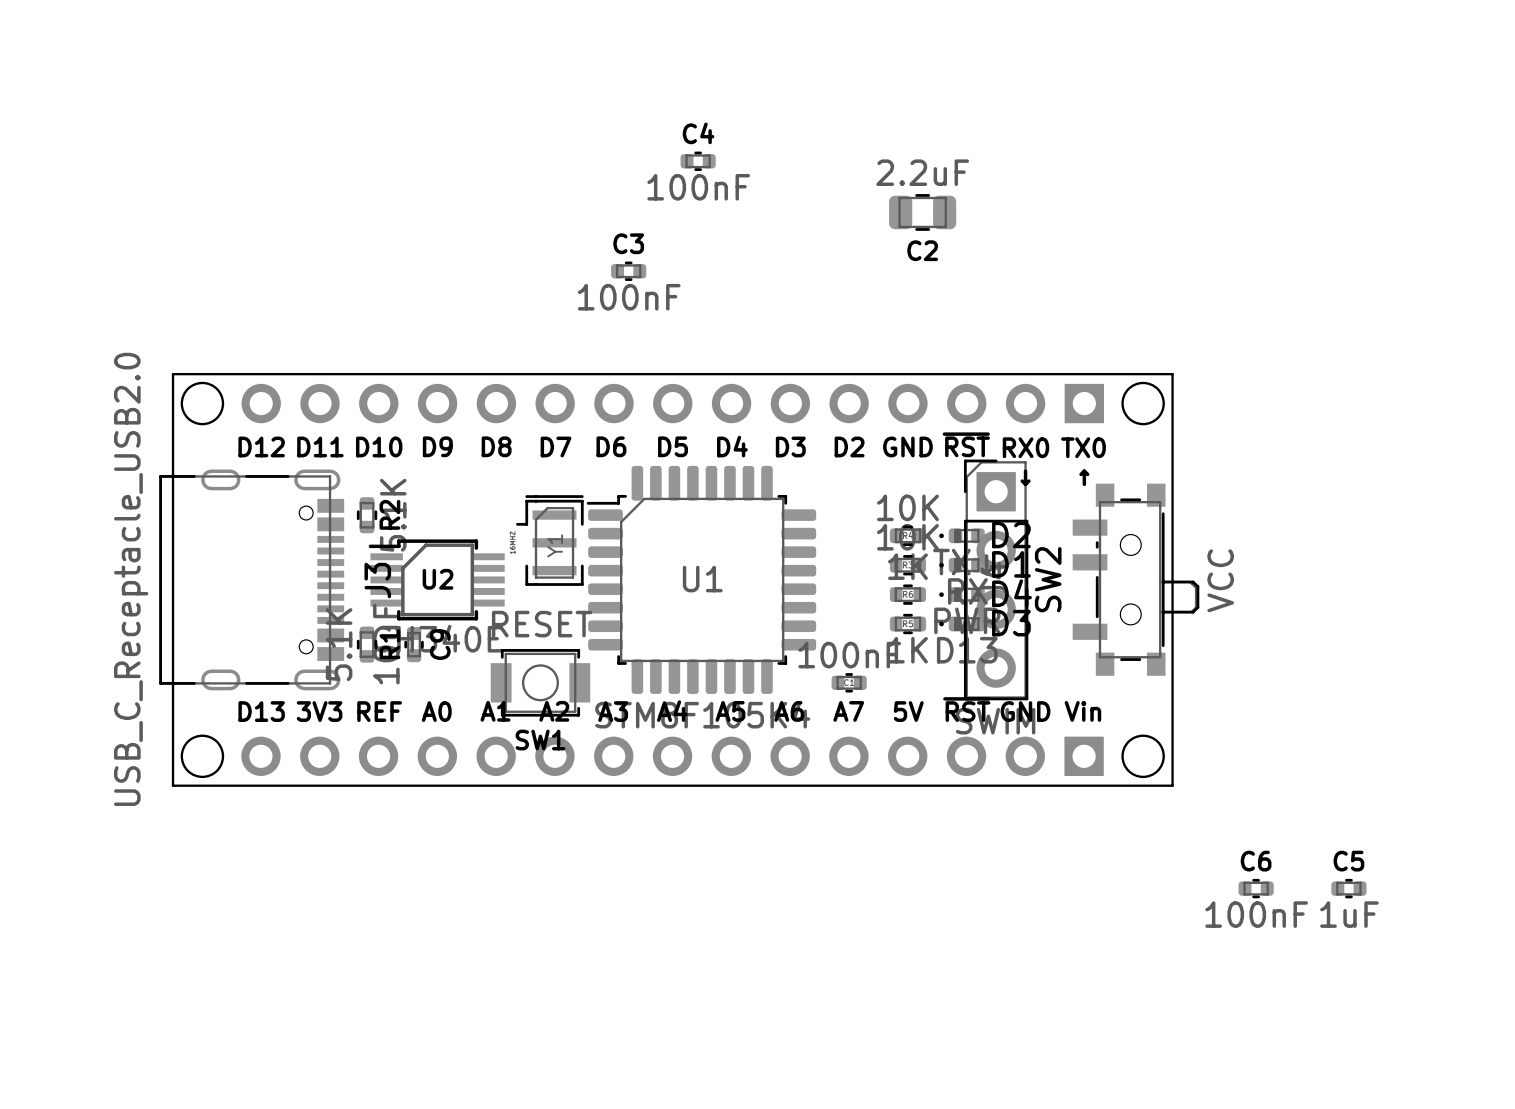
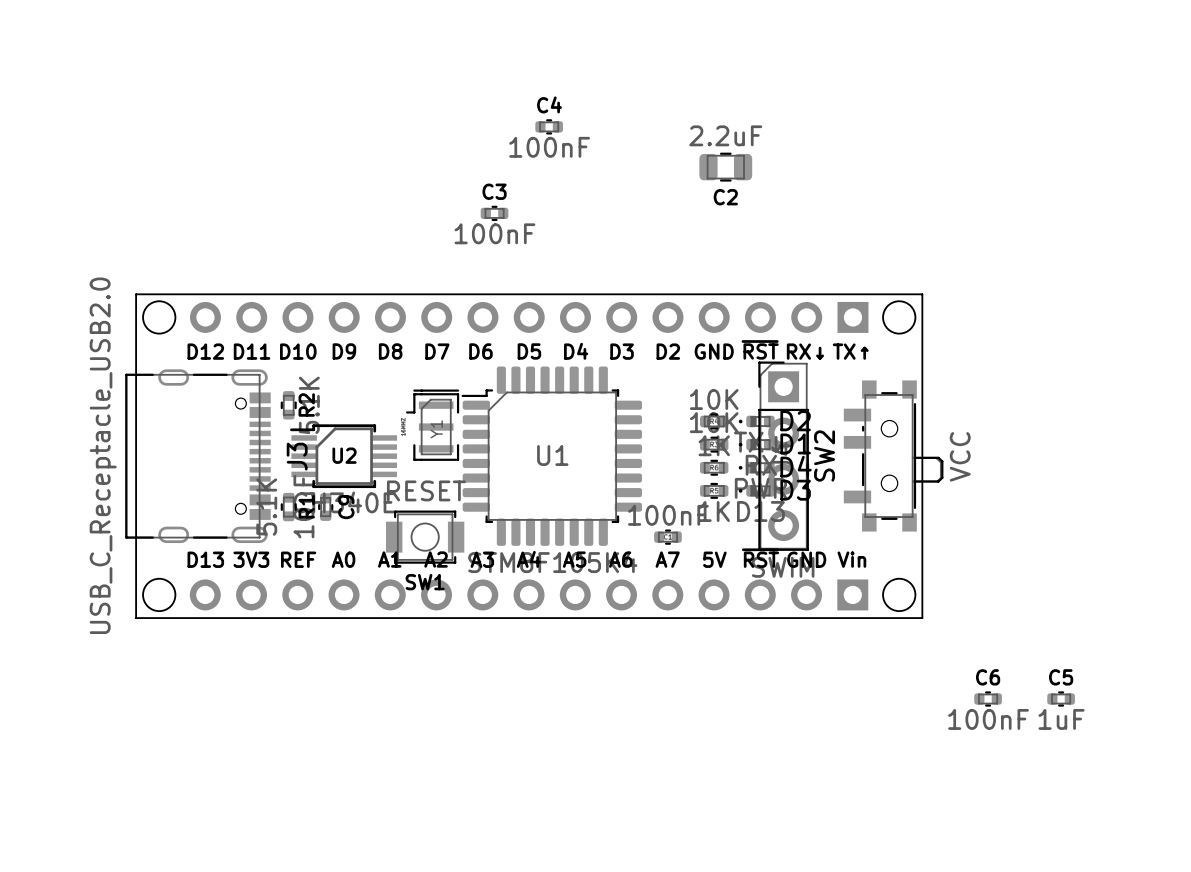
text: RX0 (1025, 447) -> RX↓ (805, 351)
text: TX0 (1083, 447) -> TX↑ (850, 351)
text: ↓ (1025, 477) -> none
text: ↑ (1084, 477) -> none

